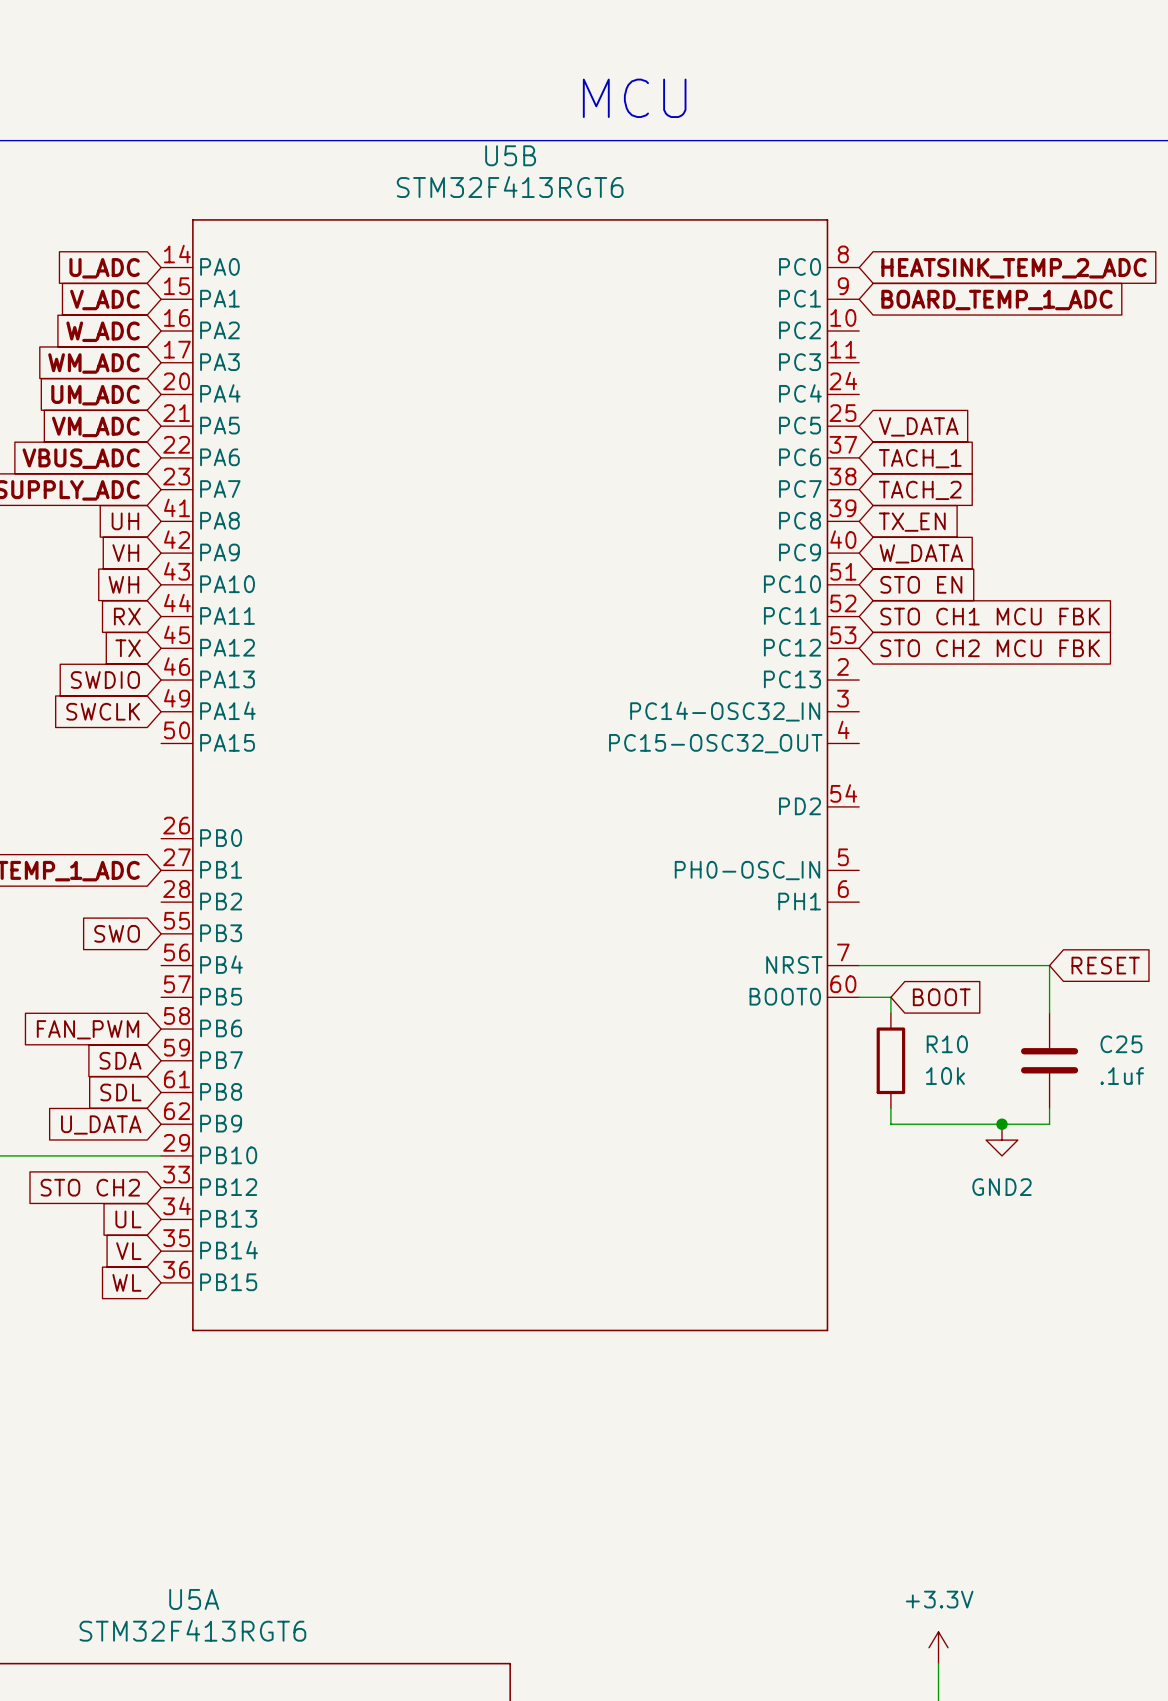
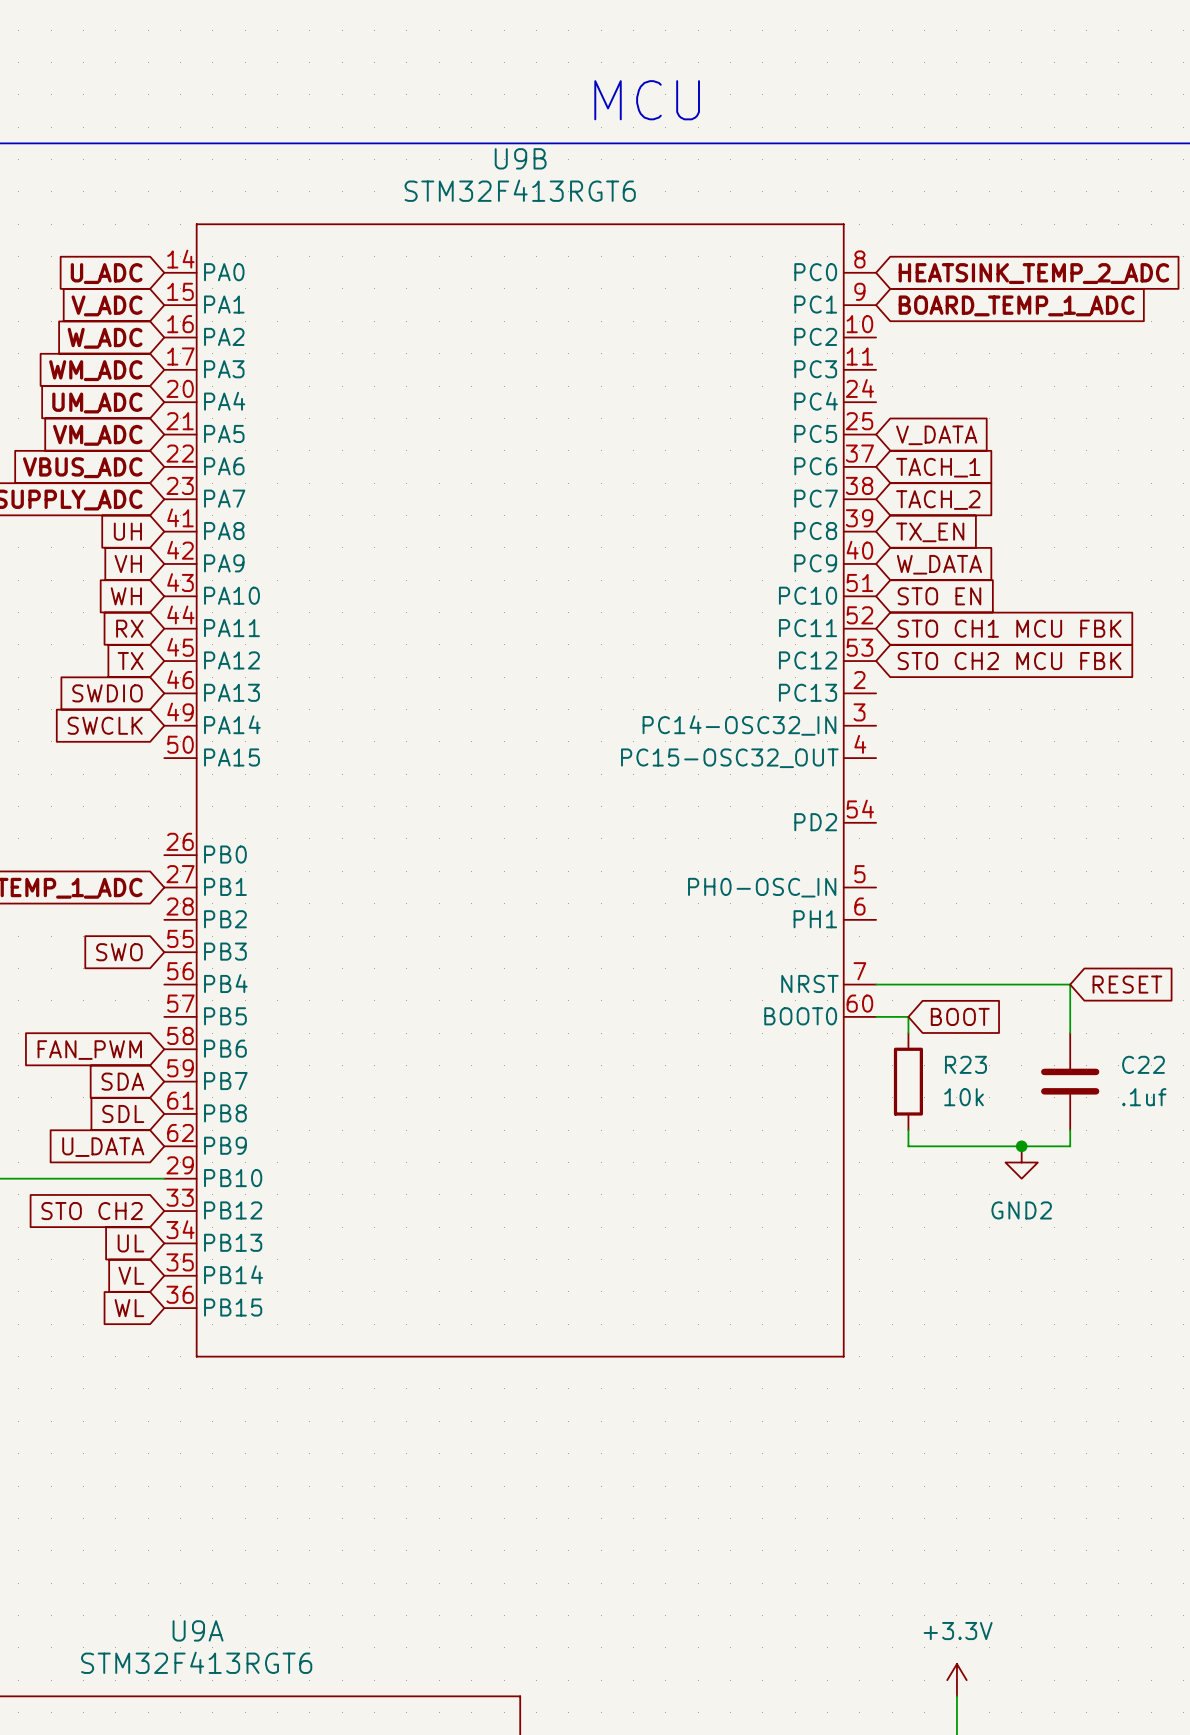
U5B name: U5B (510, 155) -> U9B (520, 158)
R10 name: R10 (947, 1044) -> R23 (965, 1064)
C25 name: C25 (1121, 1044) -> C22 (1143, 1064)
U5A name: U5A (194, 1599) -> U9A (198, 1630)

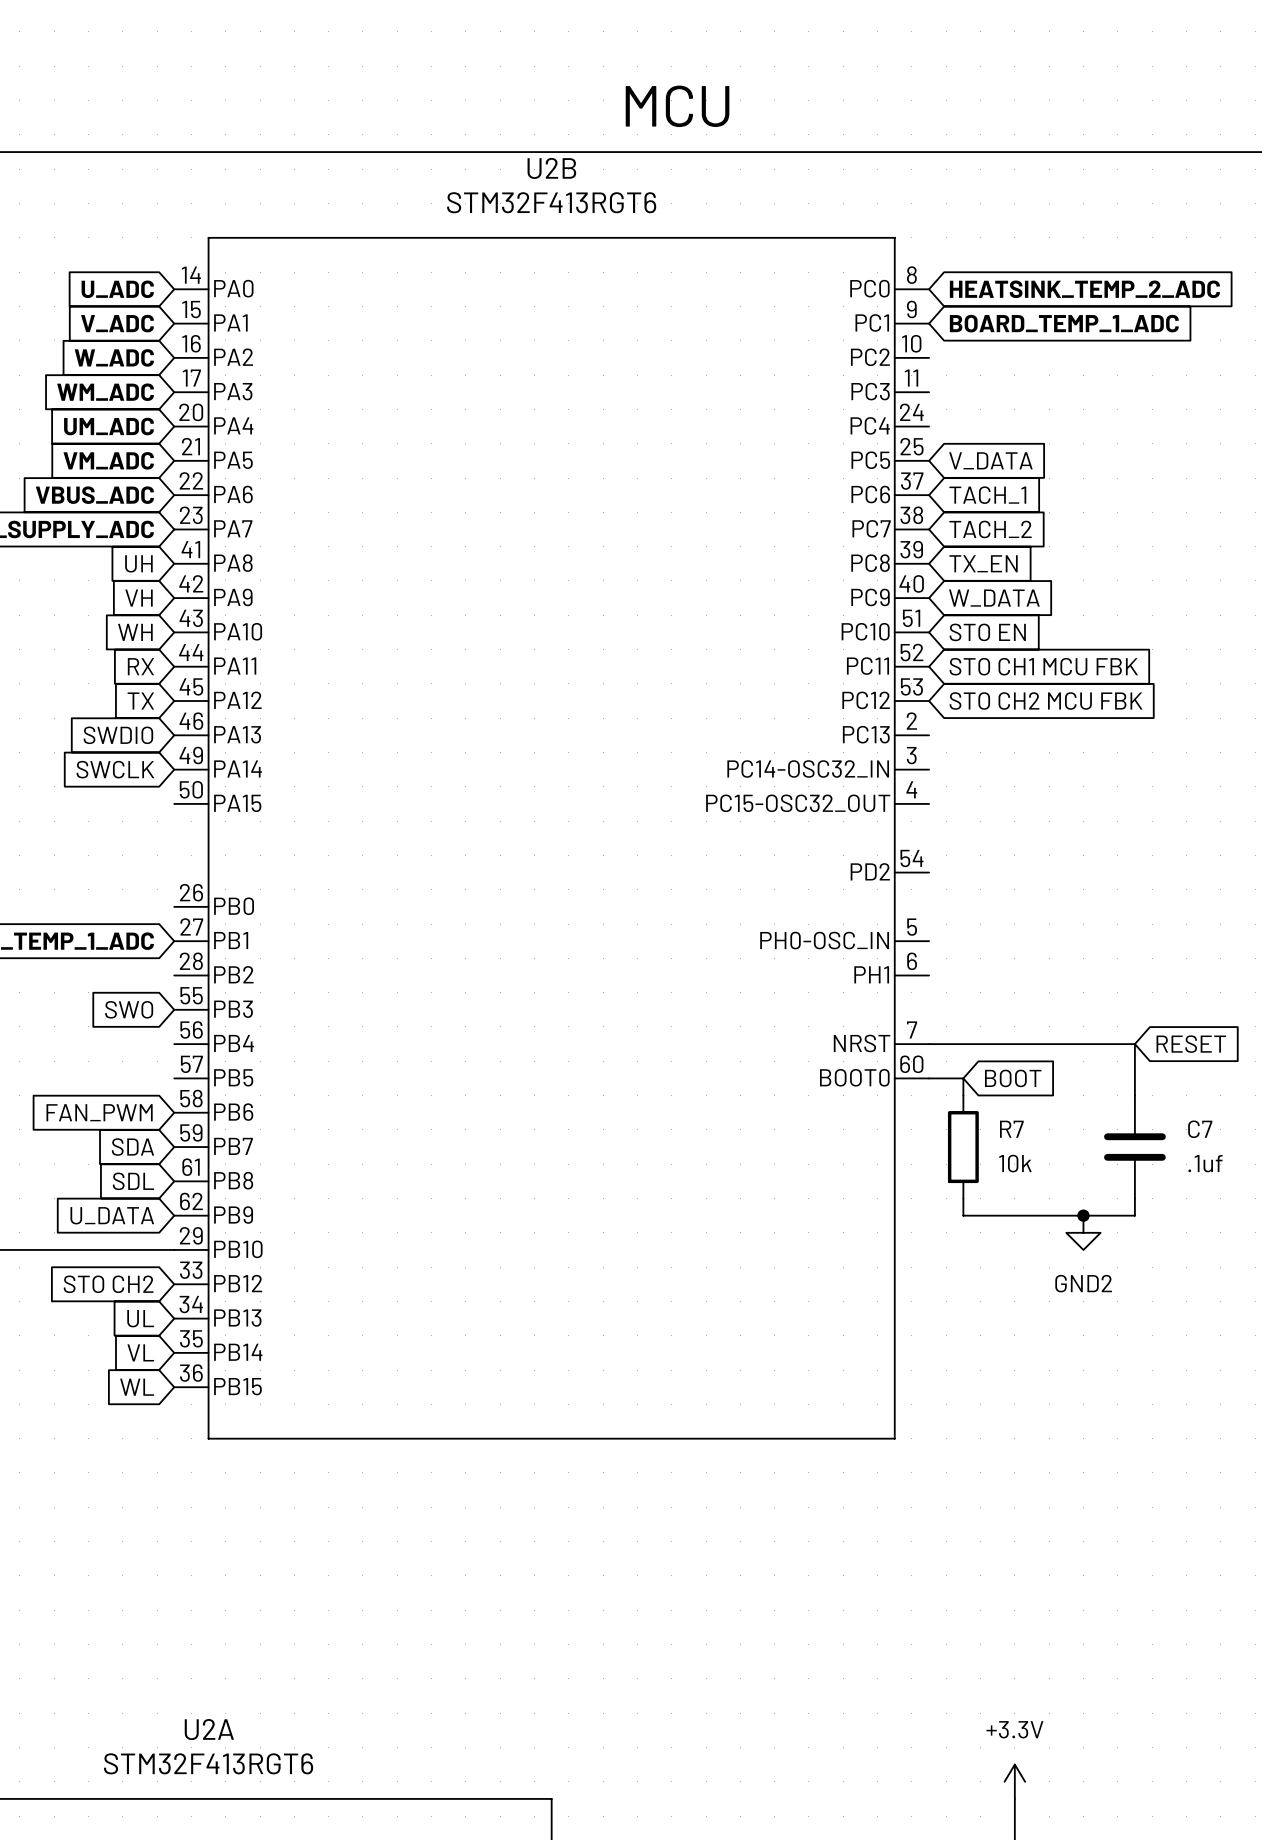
U9B name: U9B (520, 158) -> U2B (551, 168)
R23 name: R23 (965, 1064) -> R7 (1011, 1129)
C22 name: C22 (1143, 1064) -> C7 (1200, 1129)
U9A name: U9A (198, 1630) -> U2A (209, 1729)

